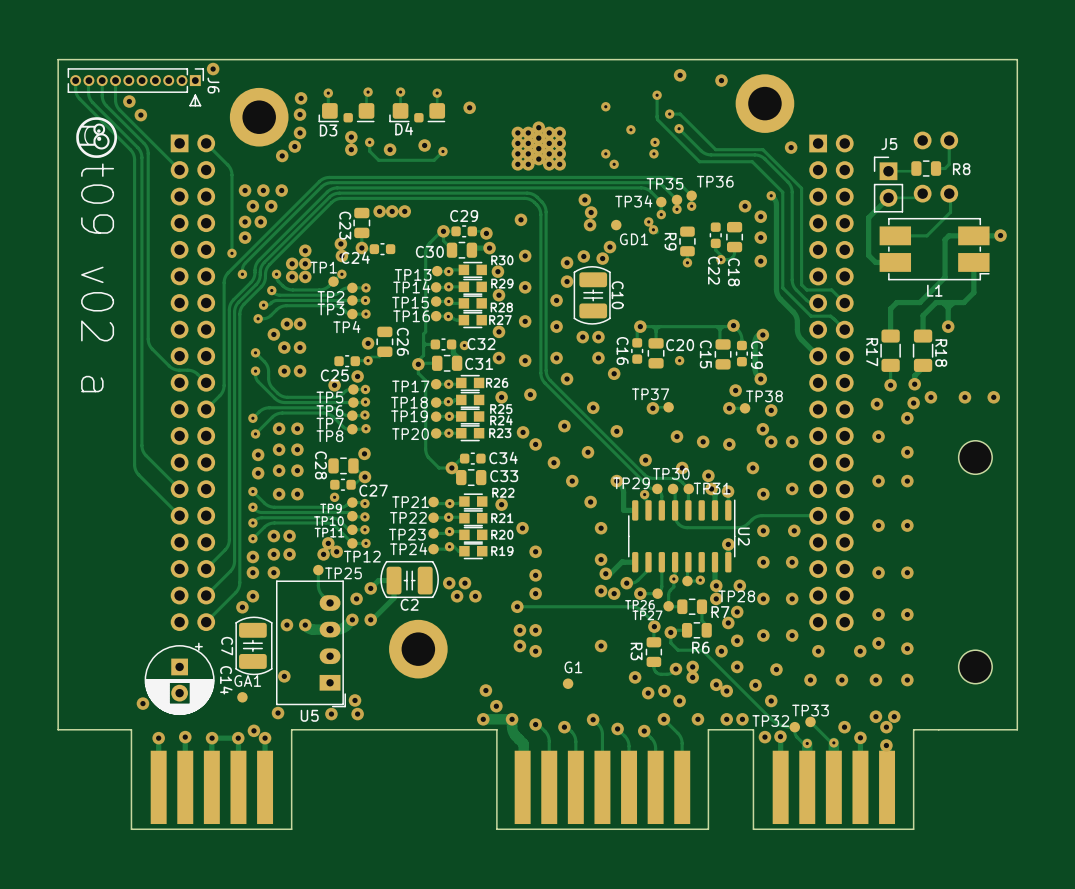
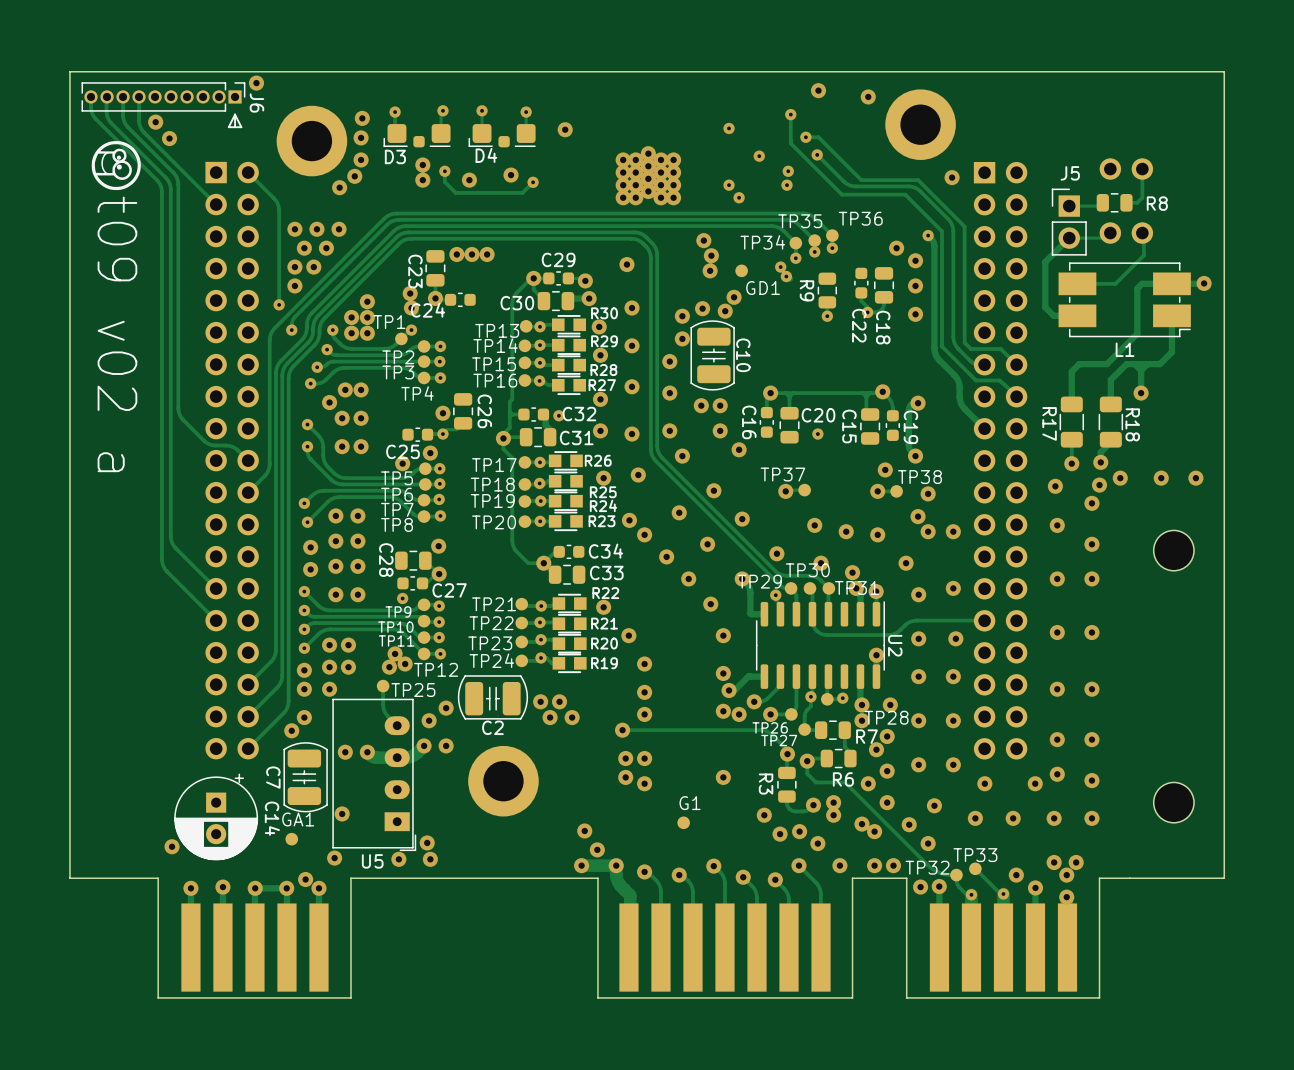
track: (370, 588) (378, 580) (394, 580) (394, 598) (372, 619) -> none

